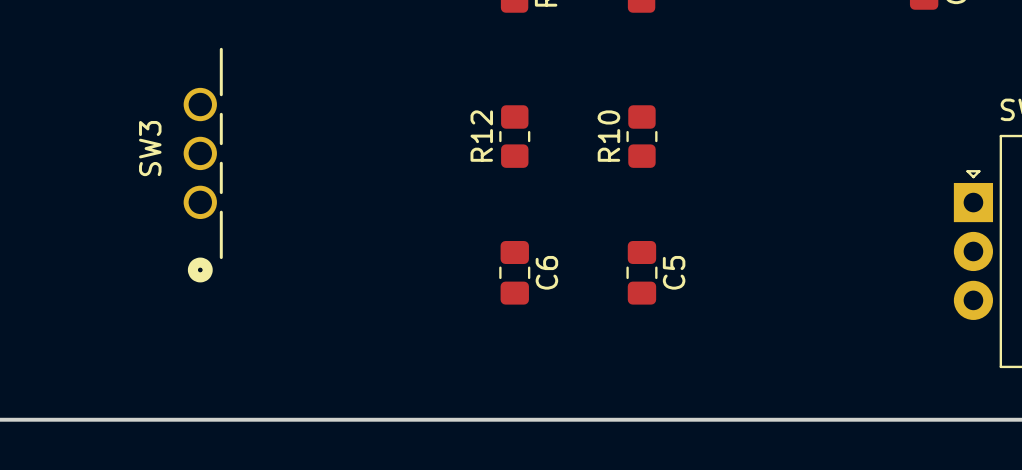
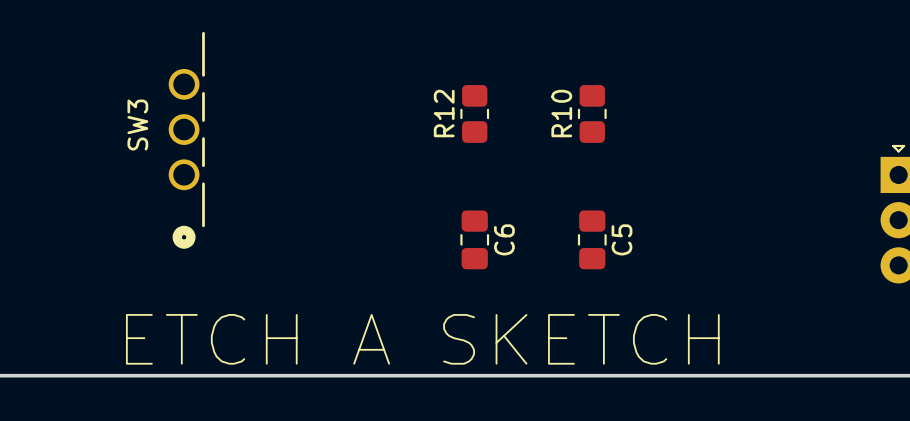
text: none -> ETCH A SKETCH (422, 339)

